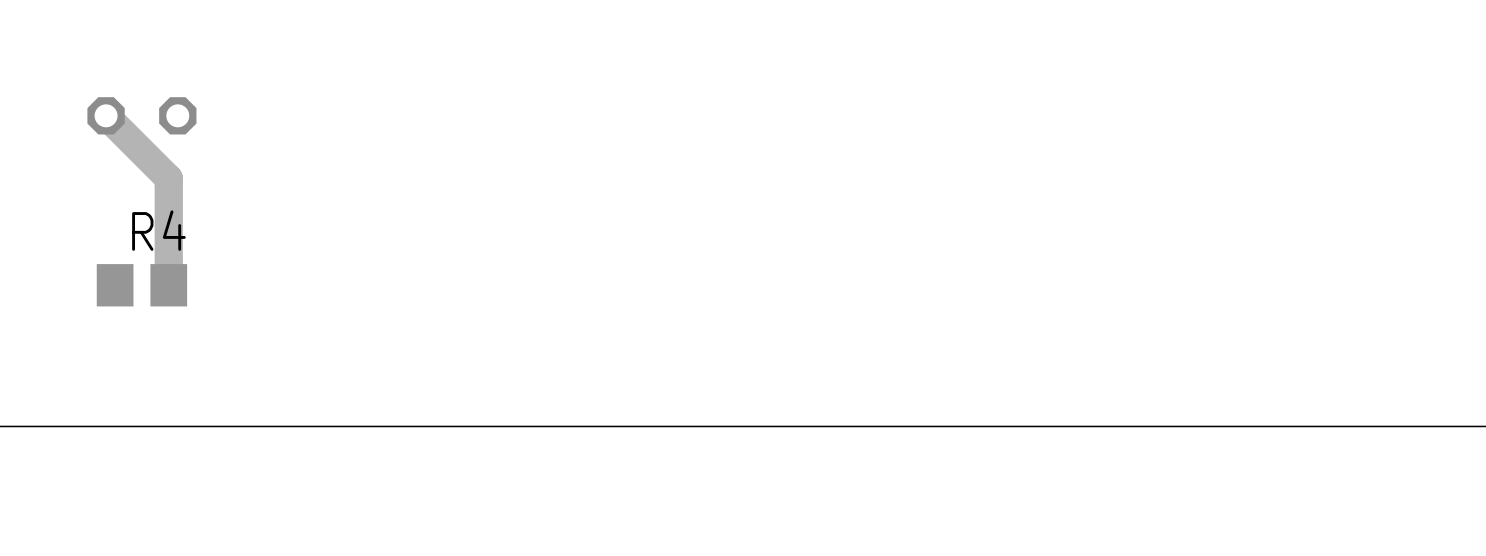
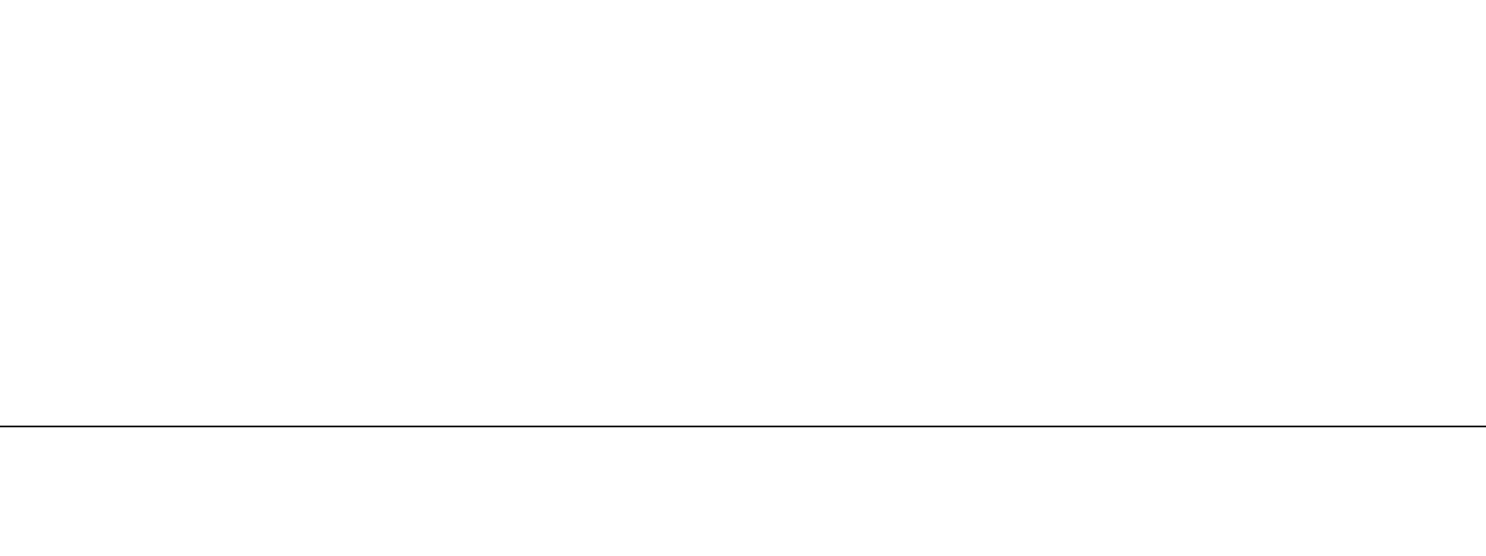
track: (106, 115) (168, 178) (168, 285) -> none
part: (141, 115) -> none
R4: (141, 285) -> none

